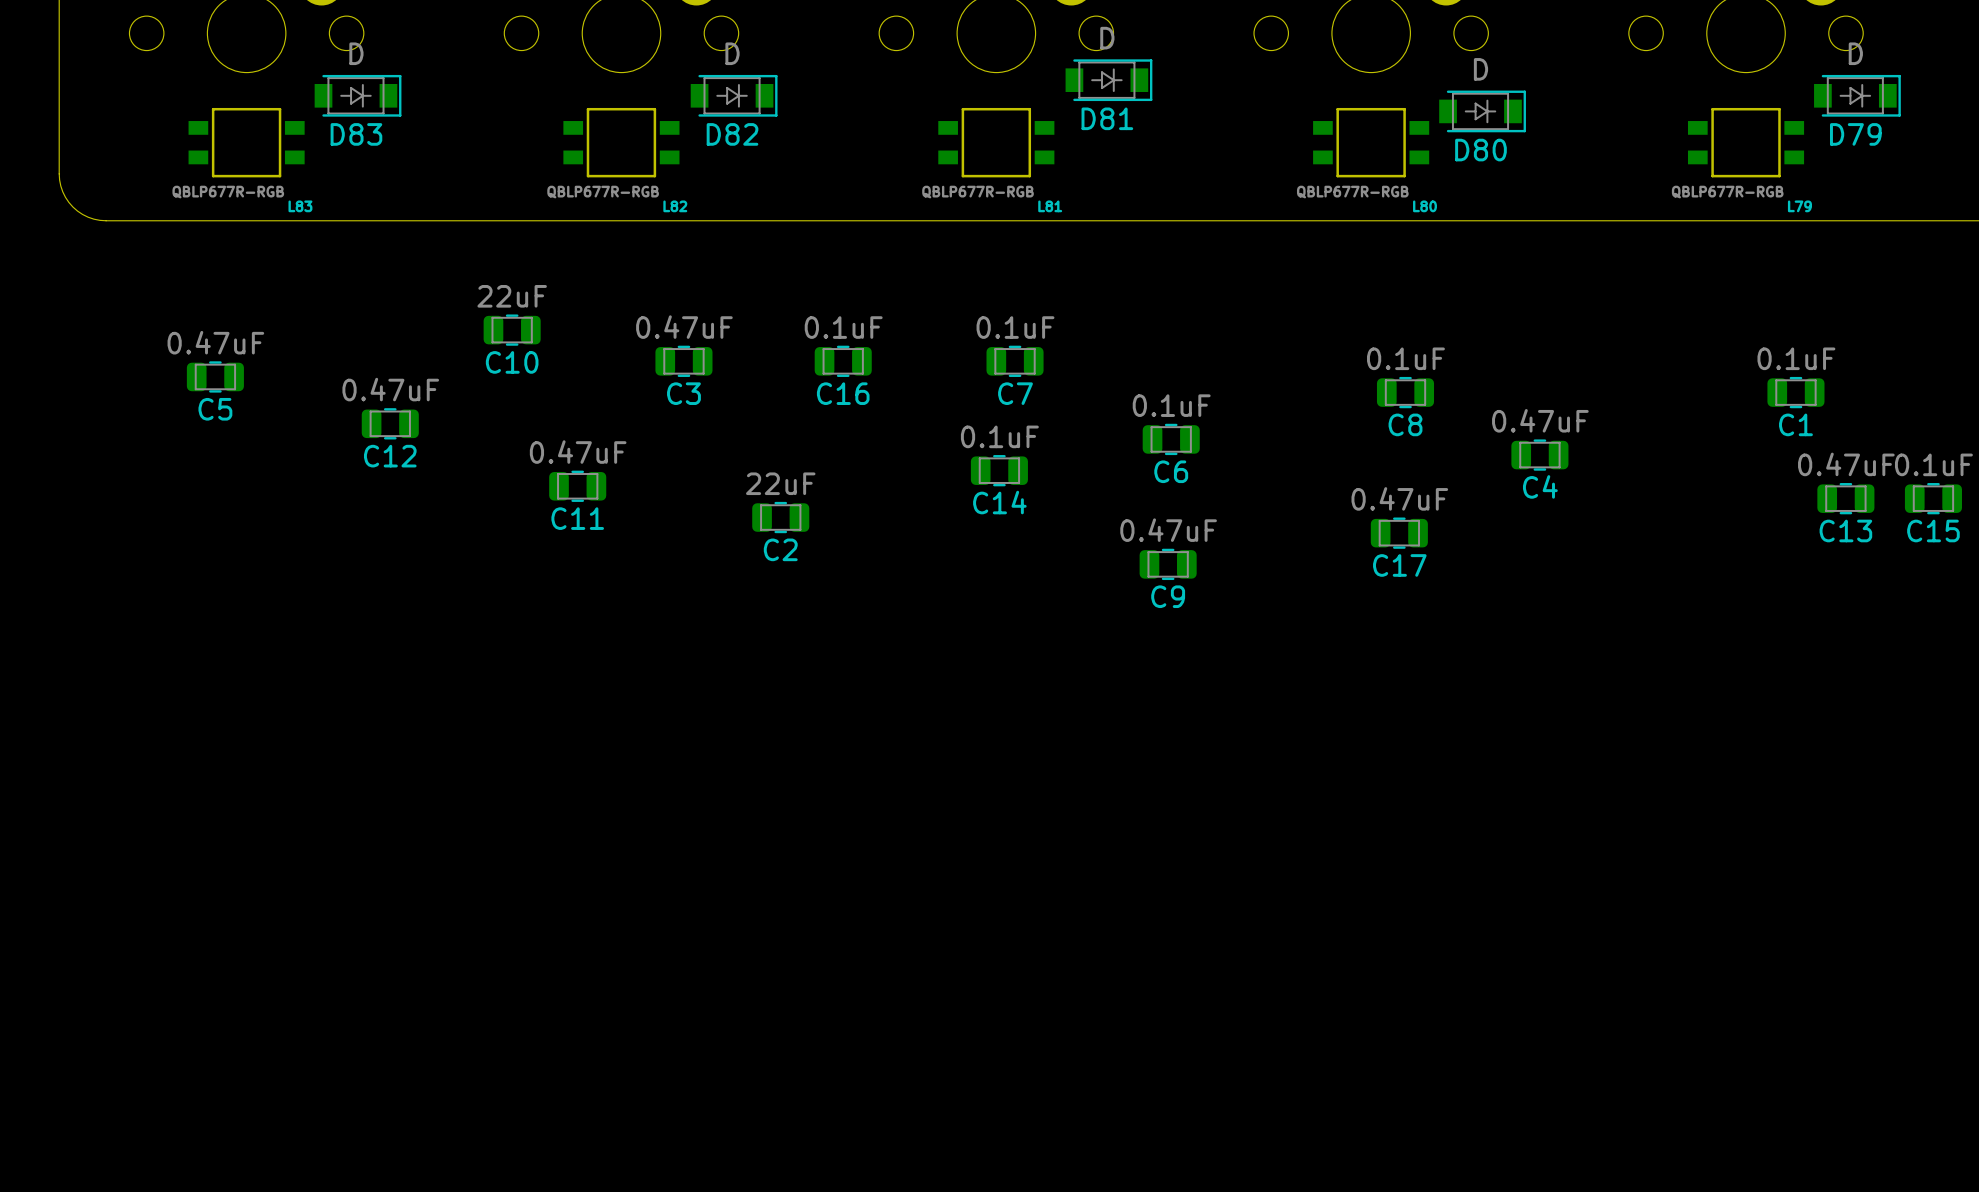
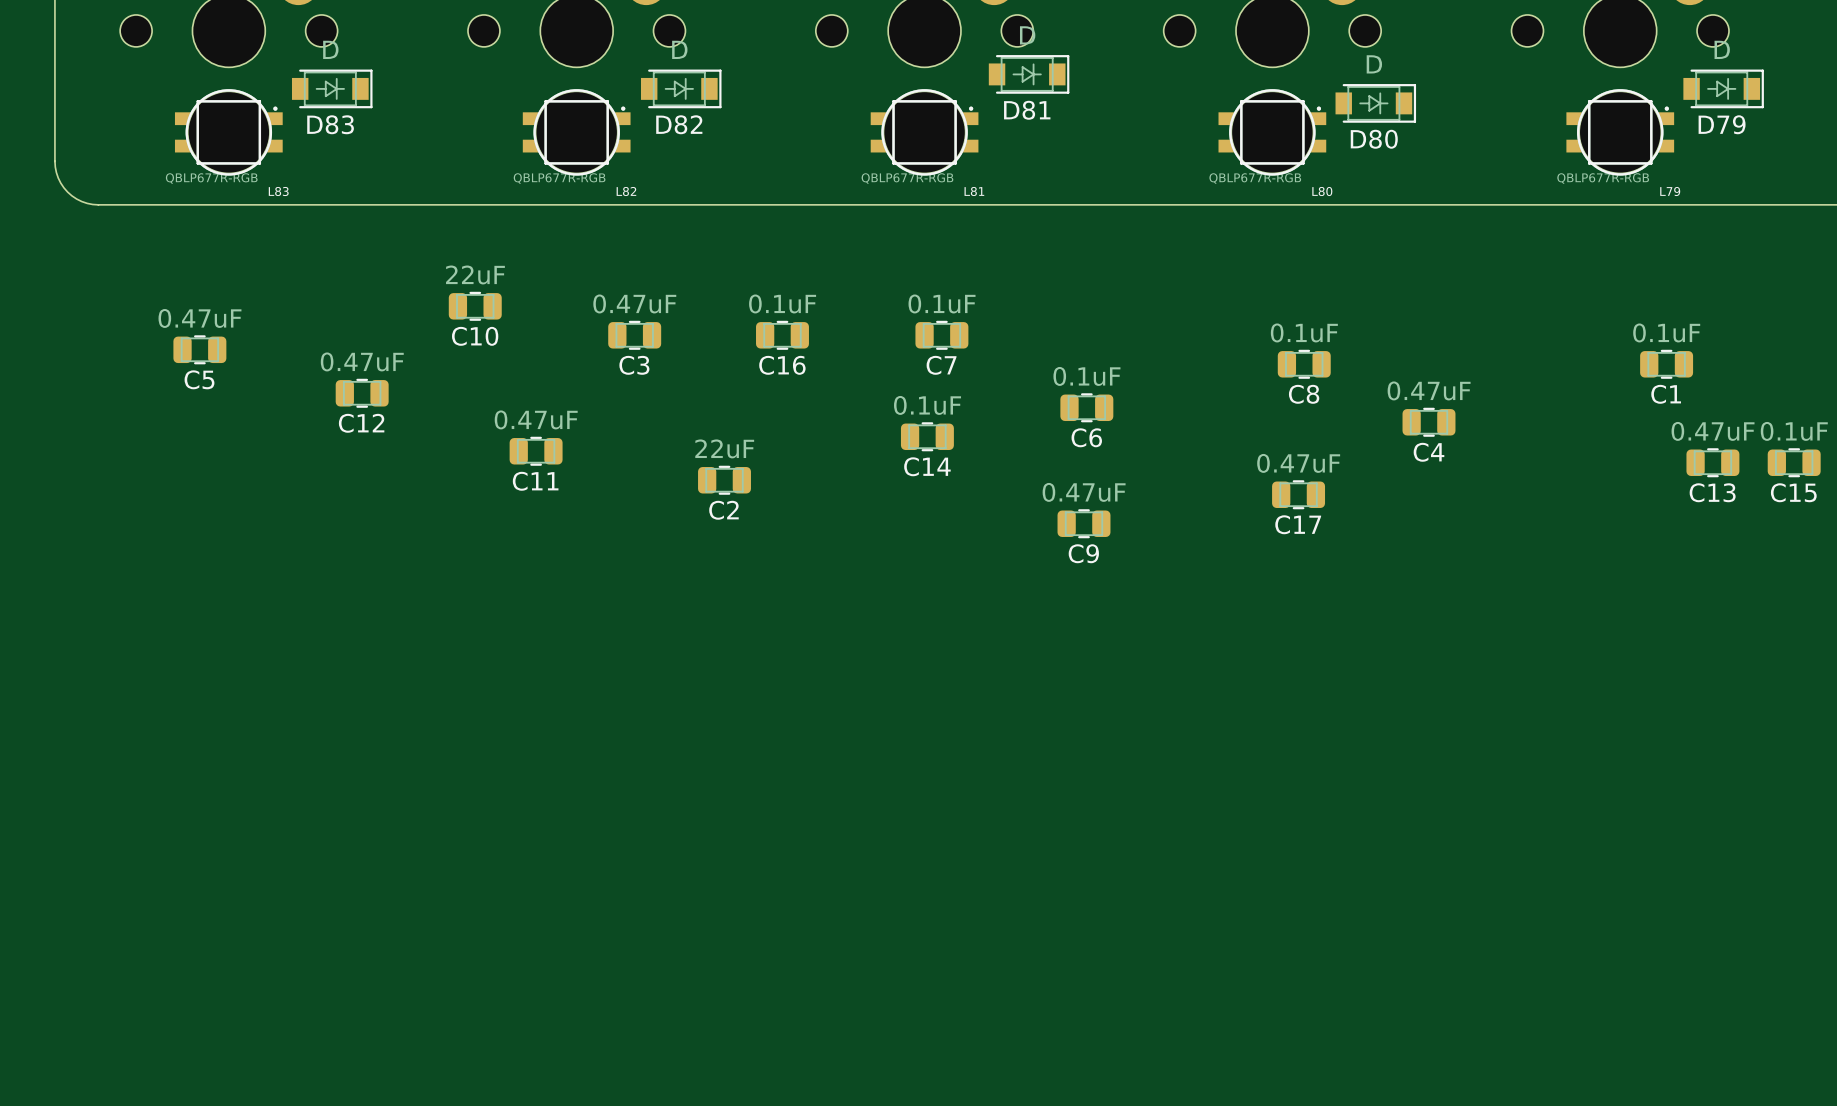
L83 footprint: [188, 107, 305, 178] -> [174, 89, 283, 176]
L82 footprint: [563, 107, 680, 178] -> [522, 89, 631, 176]
L81 footprint: [938, 107, 1055, 178] -> [870, 89, 979, 176]
L80 footprint: [1313, 107, 1430, 178] -> [1218, 89, 1327, 176]
L79 footprint: [1687, 107, 1805, 178] -> [1566, 89, 1675, 176]

